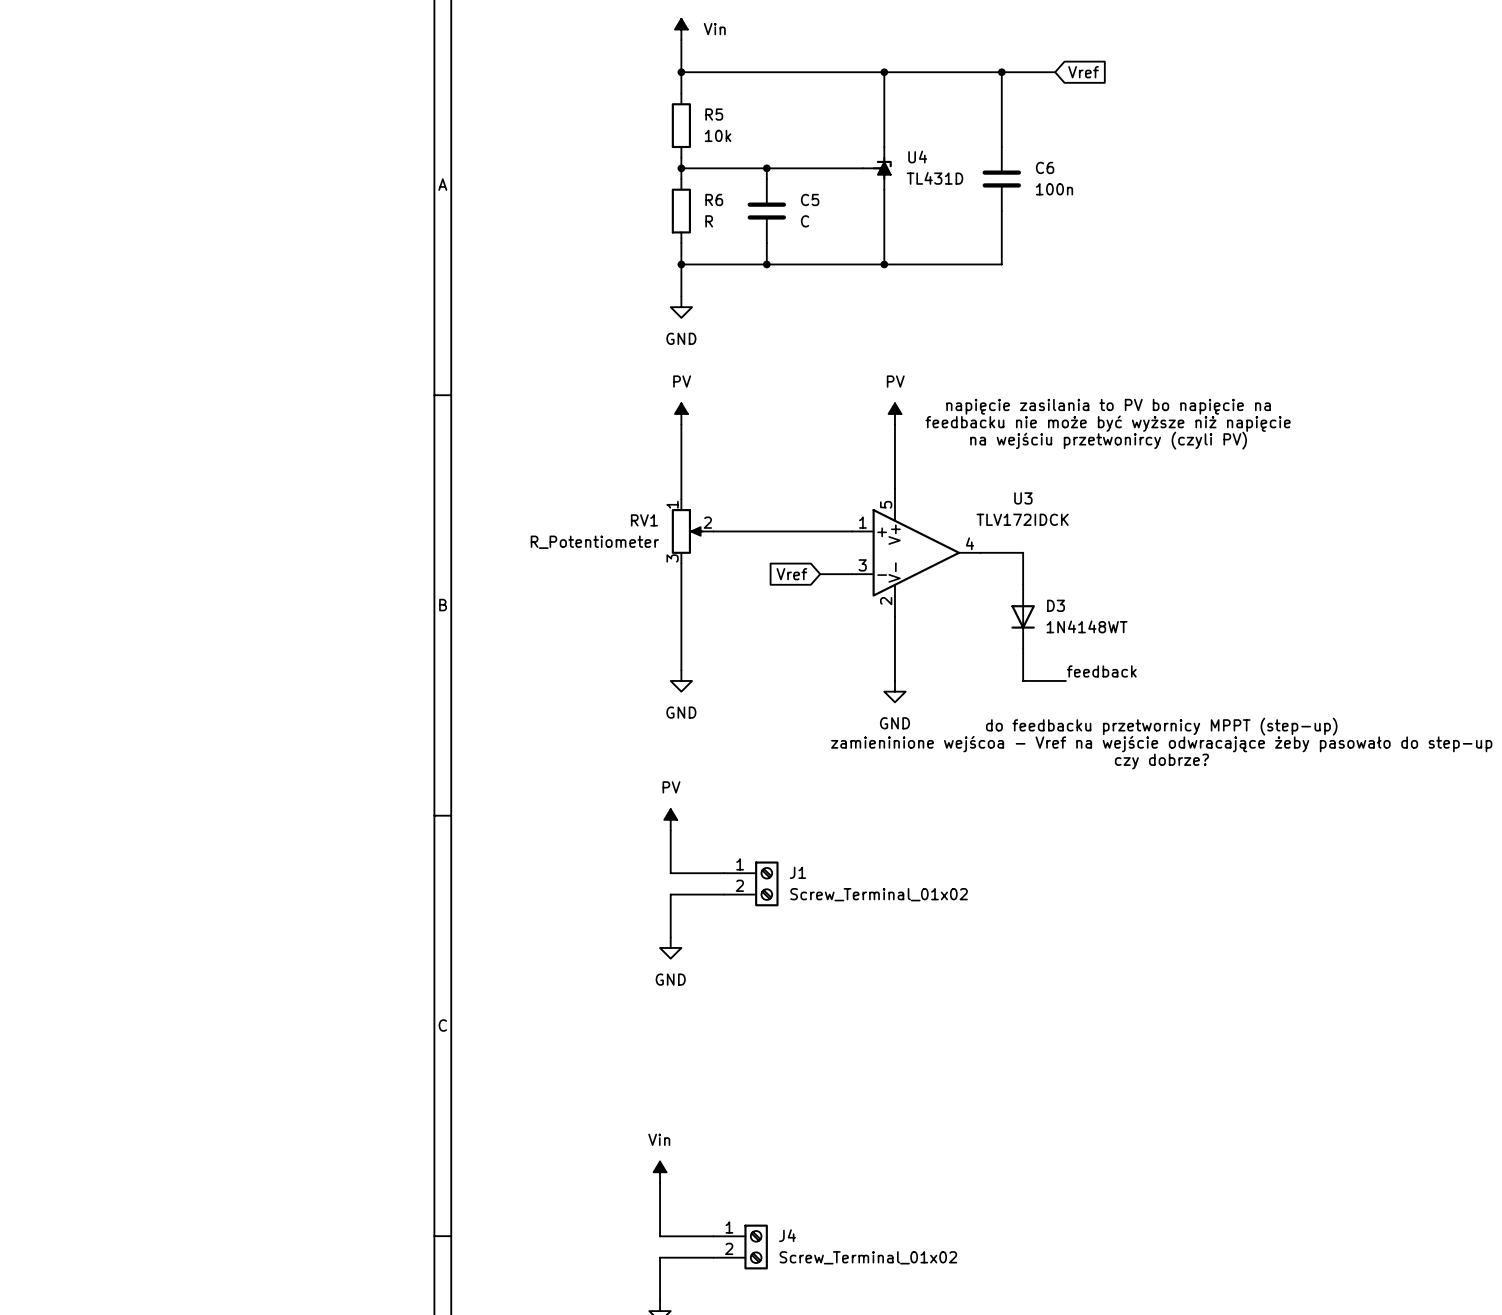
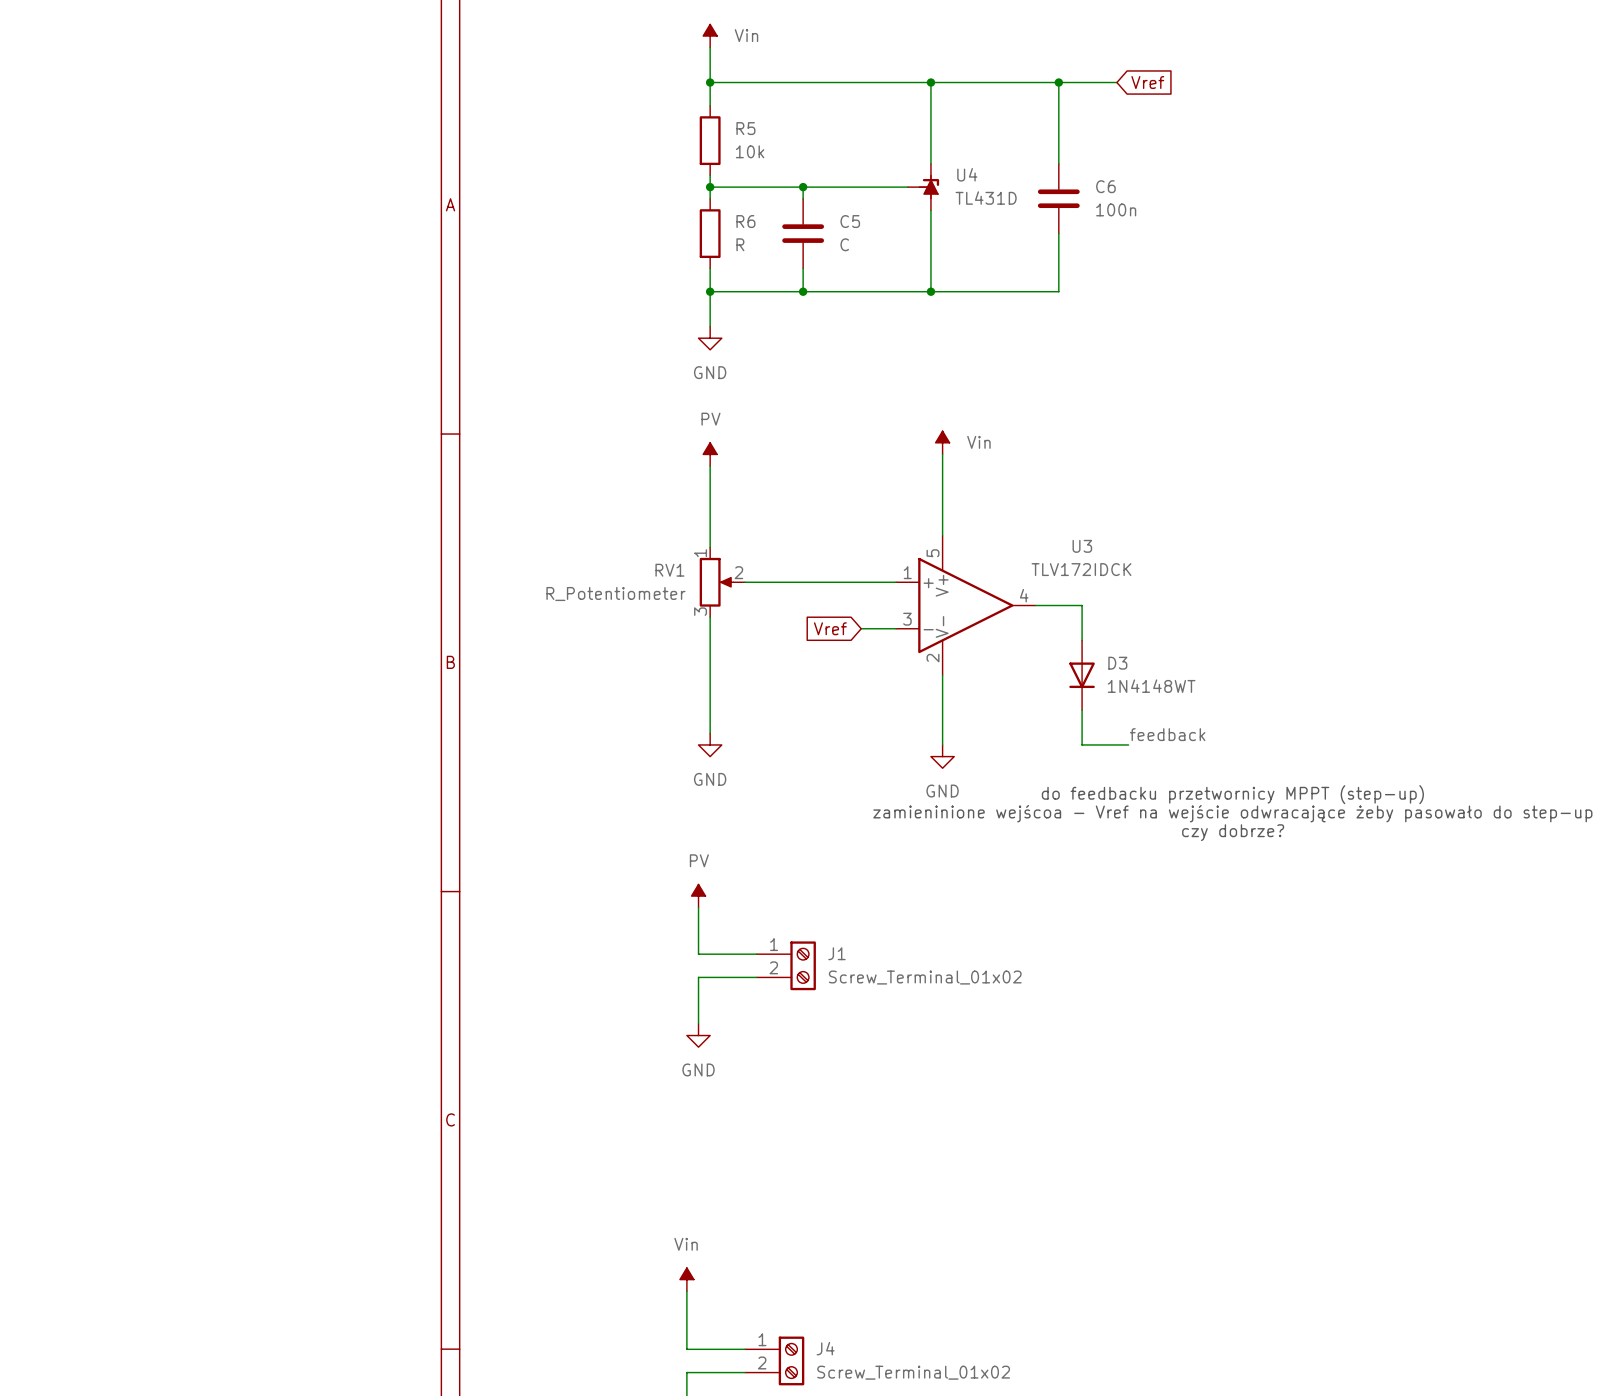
power symbol: none -> Vin (942, 442)
text: napięcie zasilania to PV bo napięcie na (1108, 406) -> none
power symbol: PV (894, 413) -> none
text: feedbacku nie może być wyższe niż napięcie (1108, 423) -> none
text: na wejściu przetwonircy (czyli PV) (1108, 440) -> none

